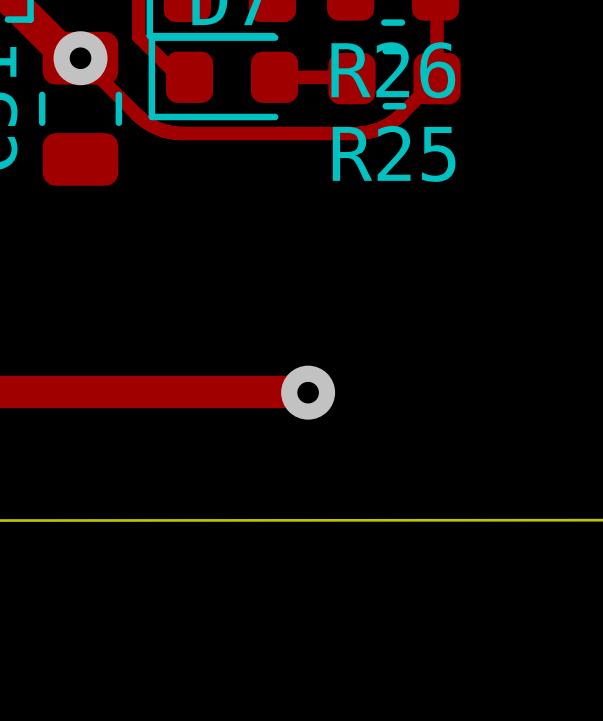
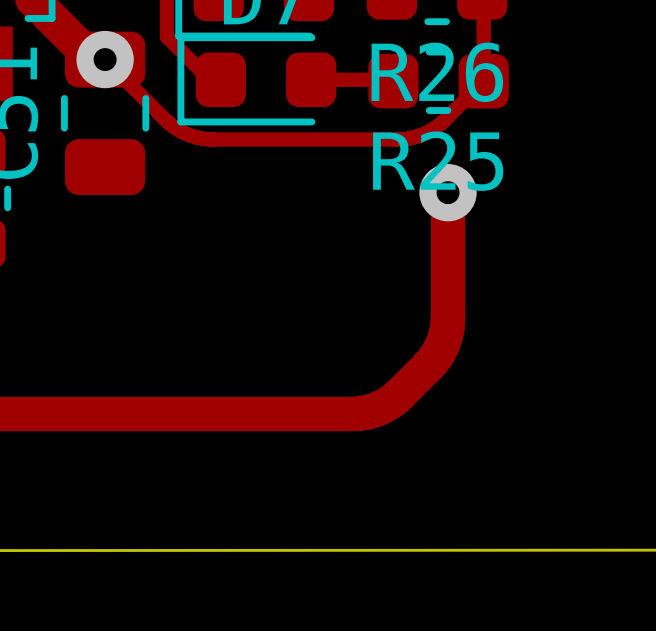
track: none -> (448, 192) (447, 321) (442, 344) (430, 364) (392, 400) (371, 411) (351, 414)
via position: (308, 392) -> (448, 192)

